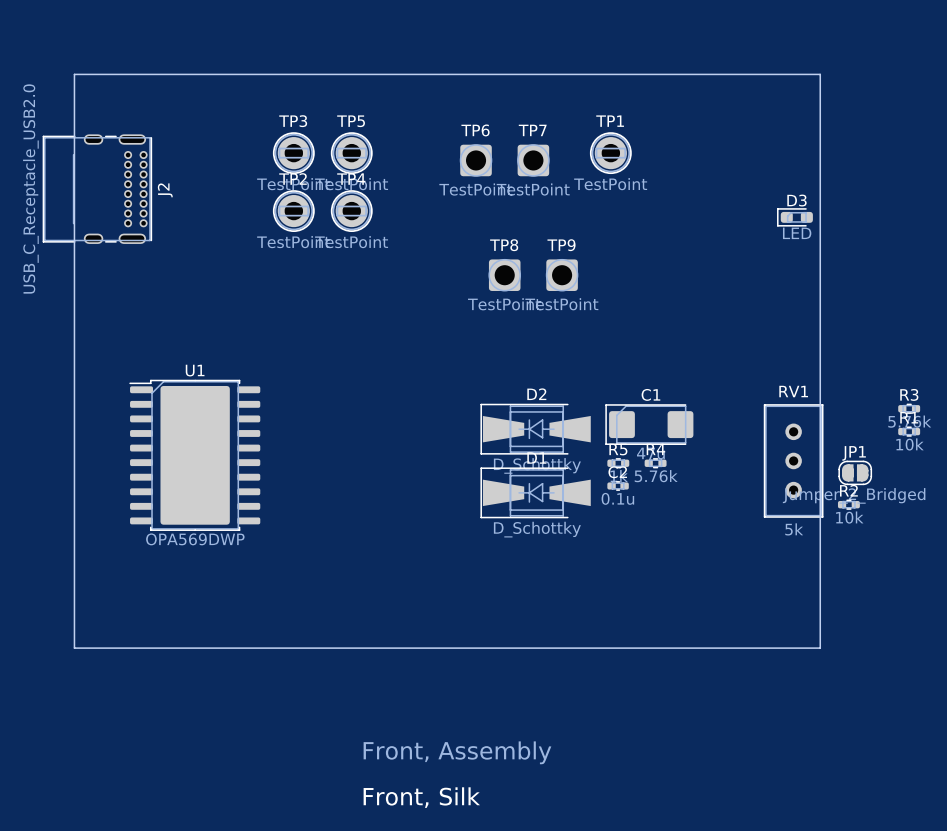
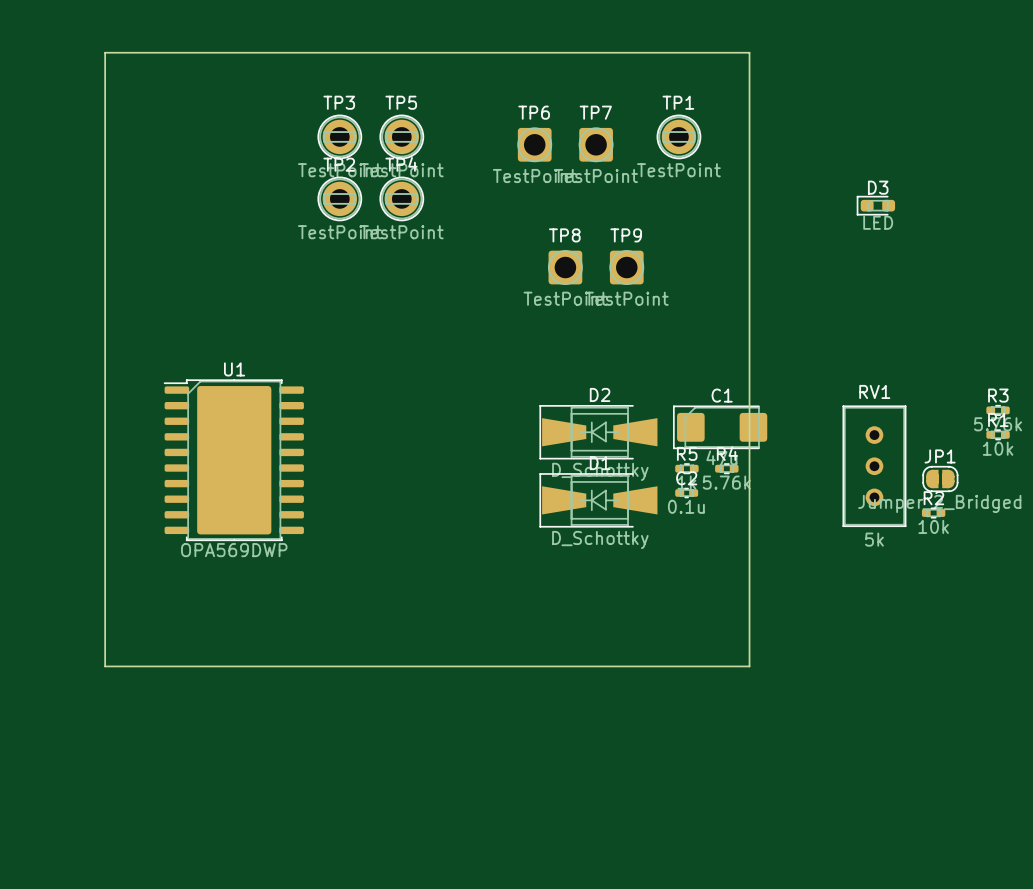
board edge: (676, 74) (820, 74) (820, 648) (676, 648) -> (749, 52) (749, 666)
J2: USB_C_Receptacle_USB2.0 (97, 189) -> none
text: Front, Assembly (457, 752) -> none
text: Front, Silk (421, 797) -> none

